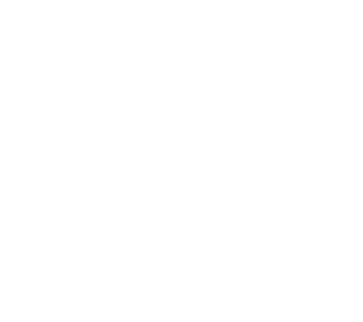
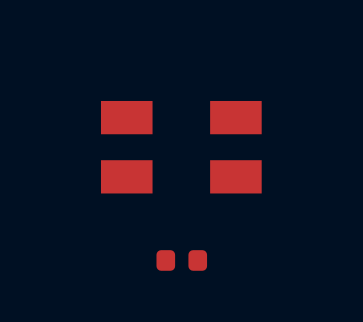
part: none -> (181, 147)
part: none -> (181, 260)

